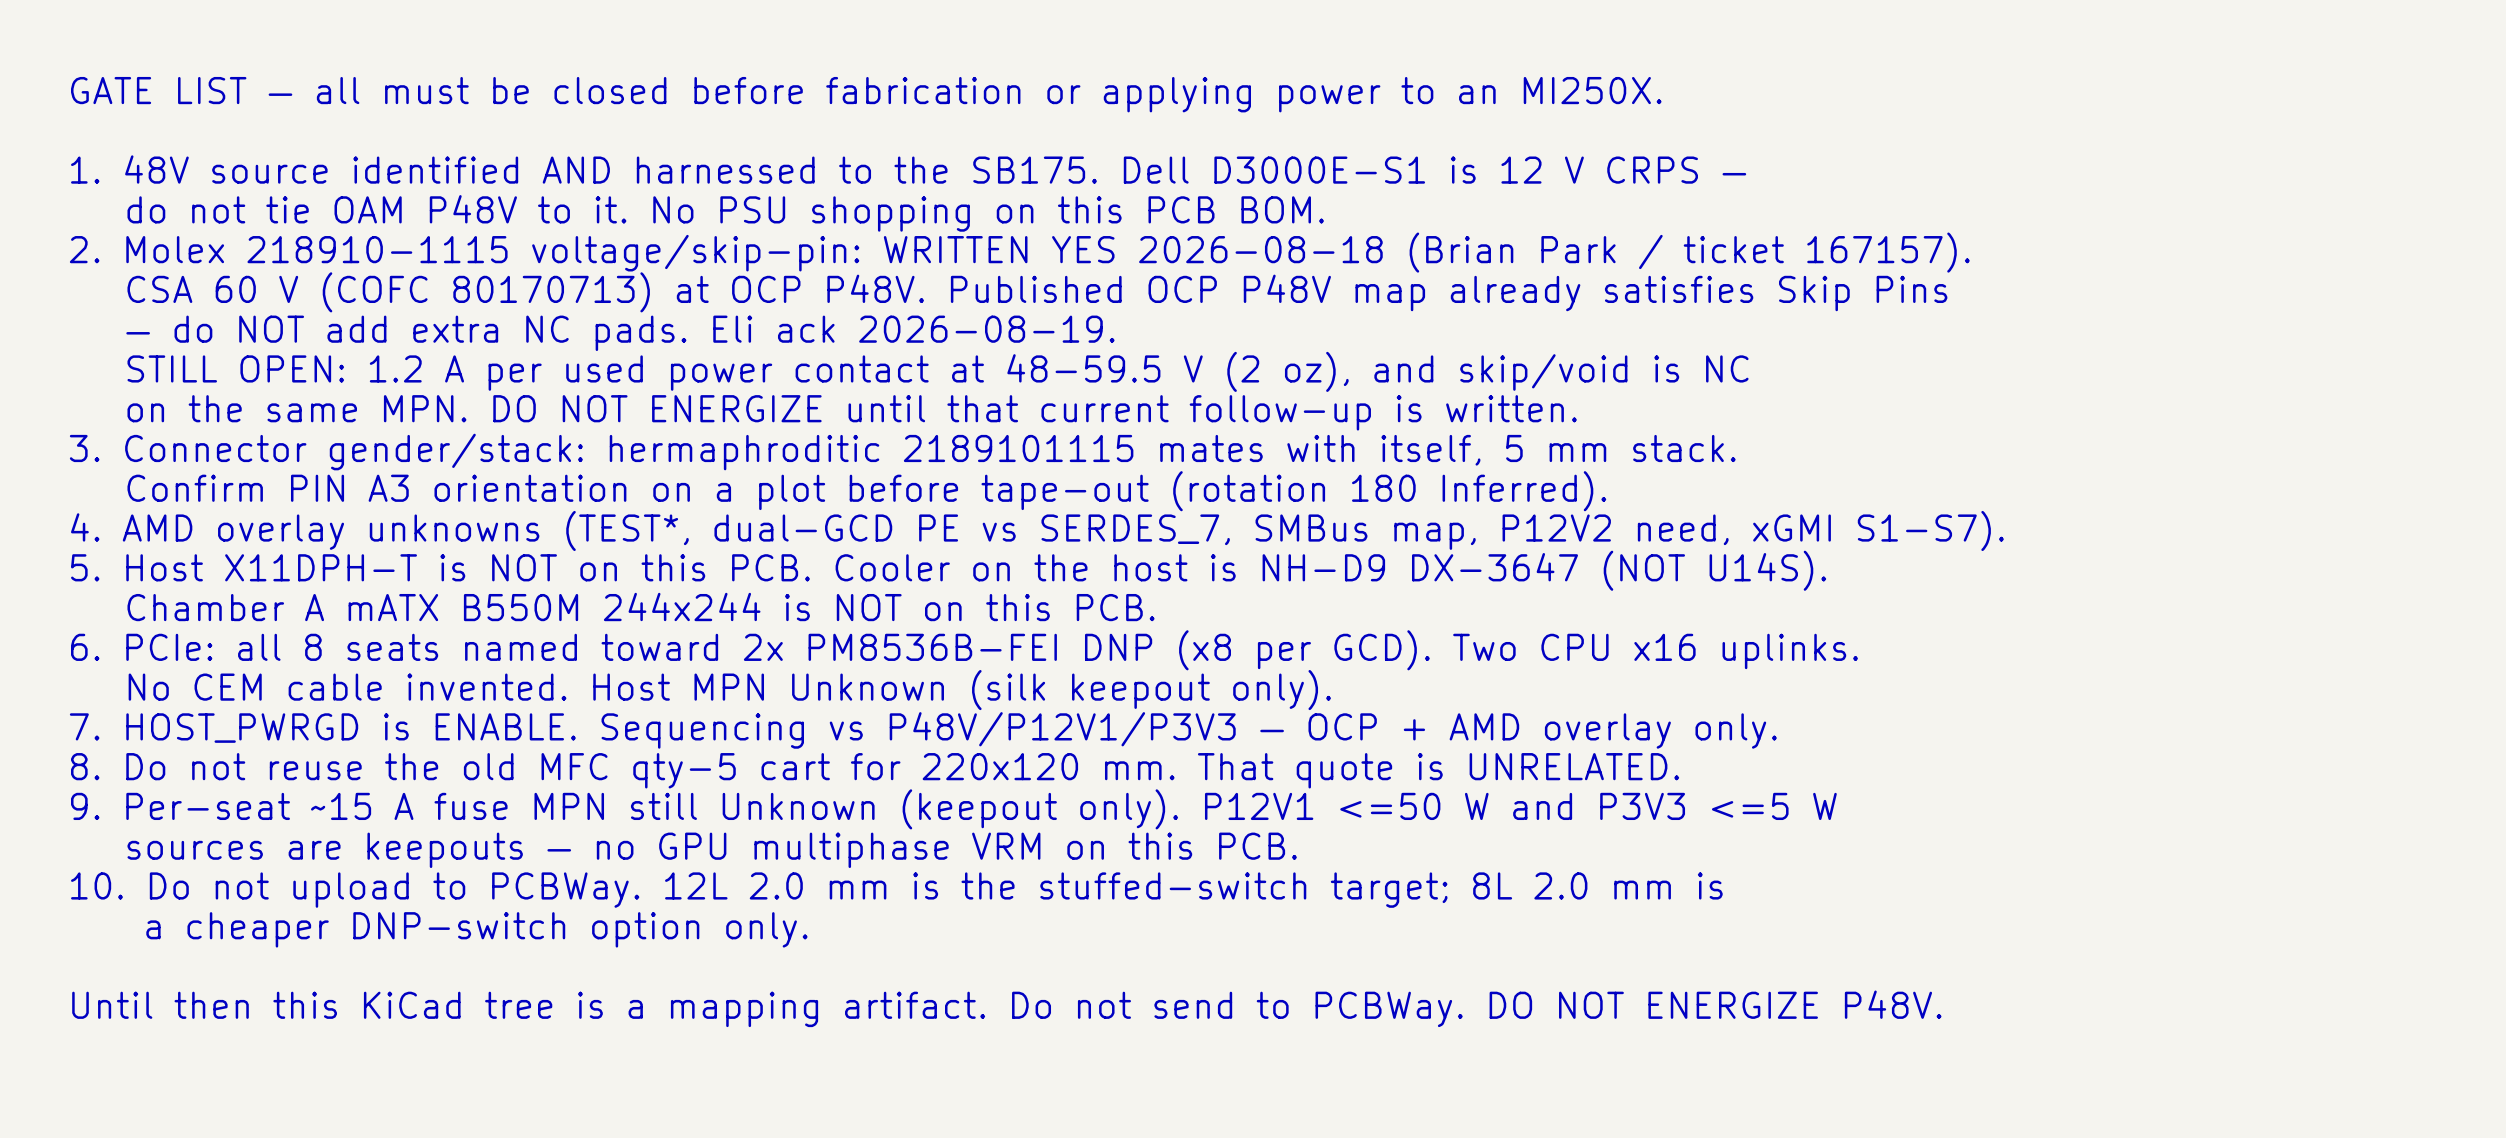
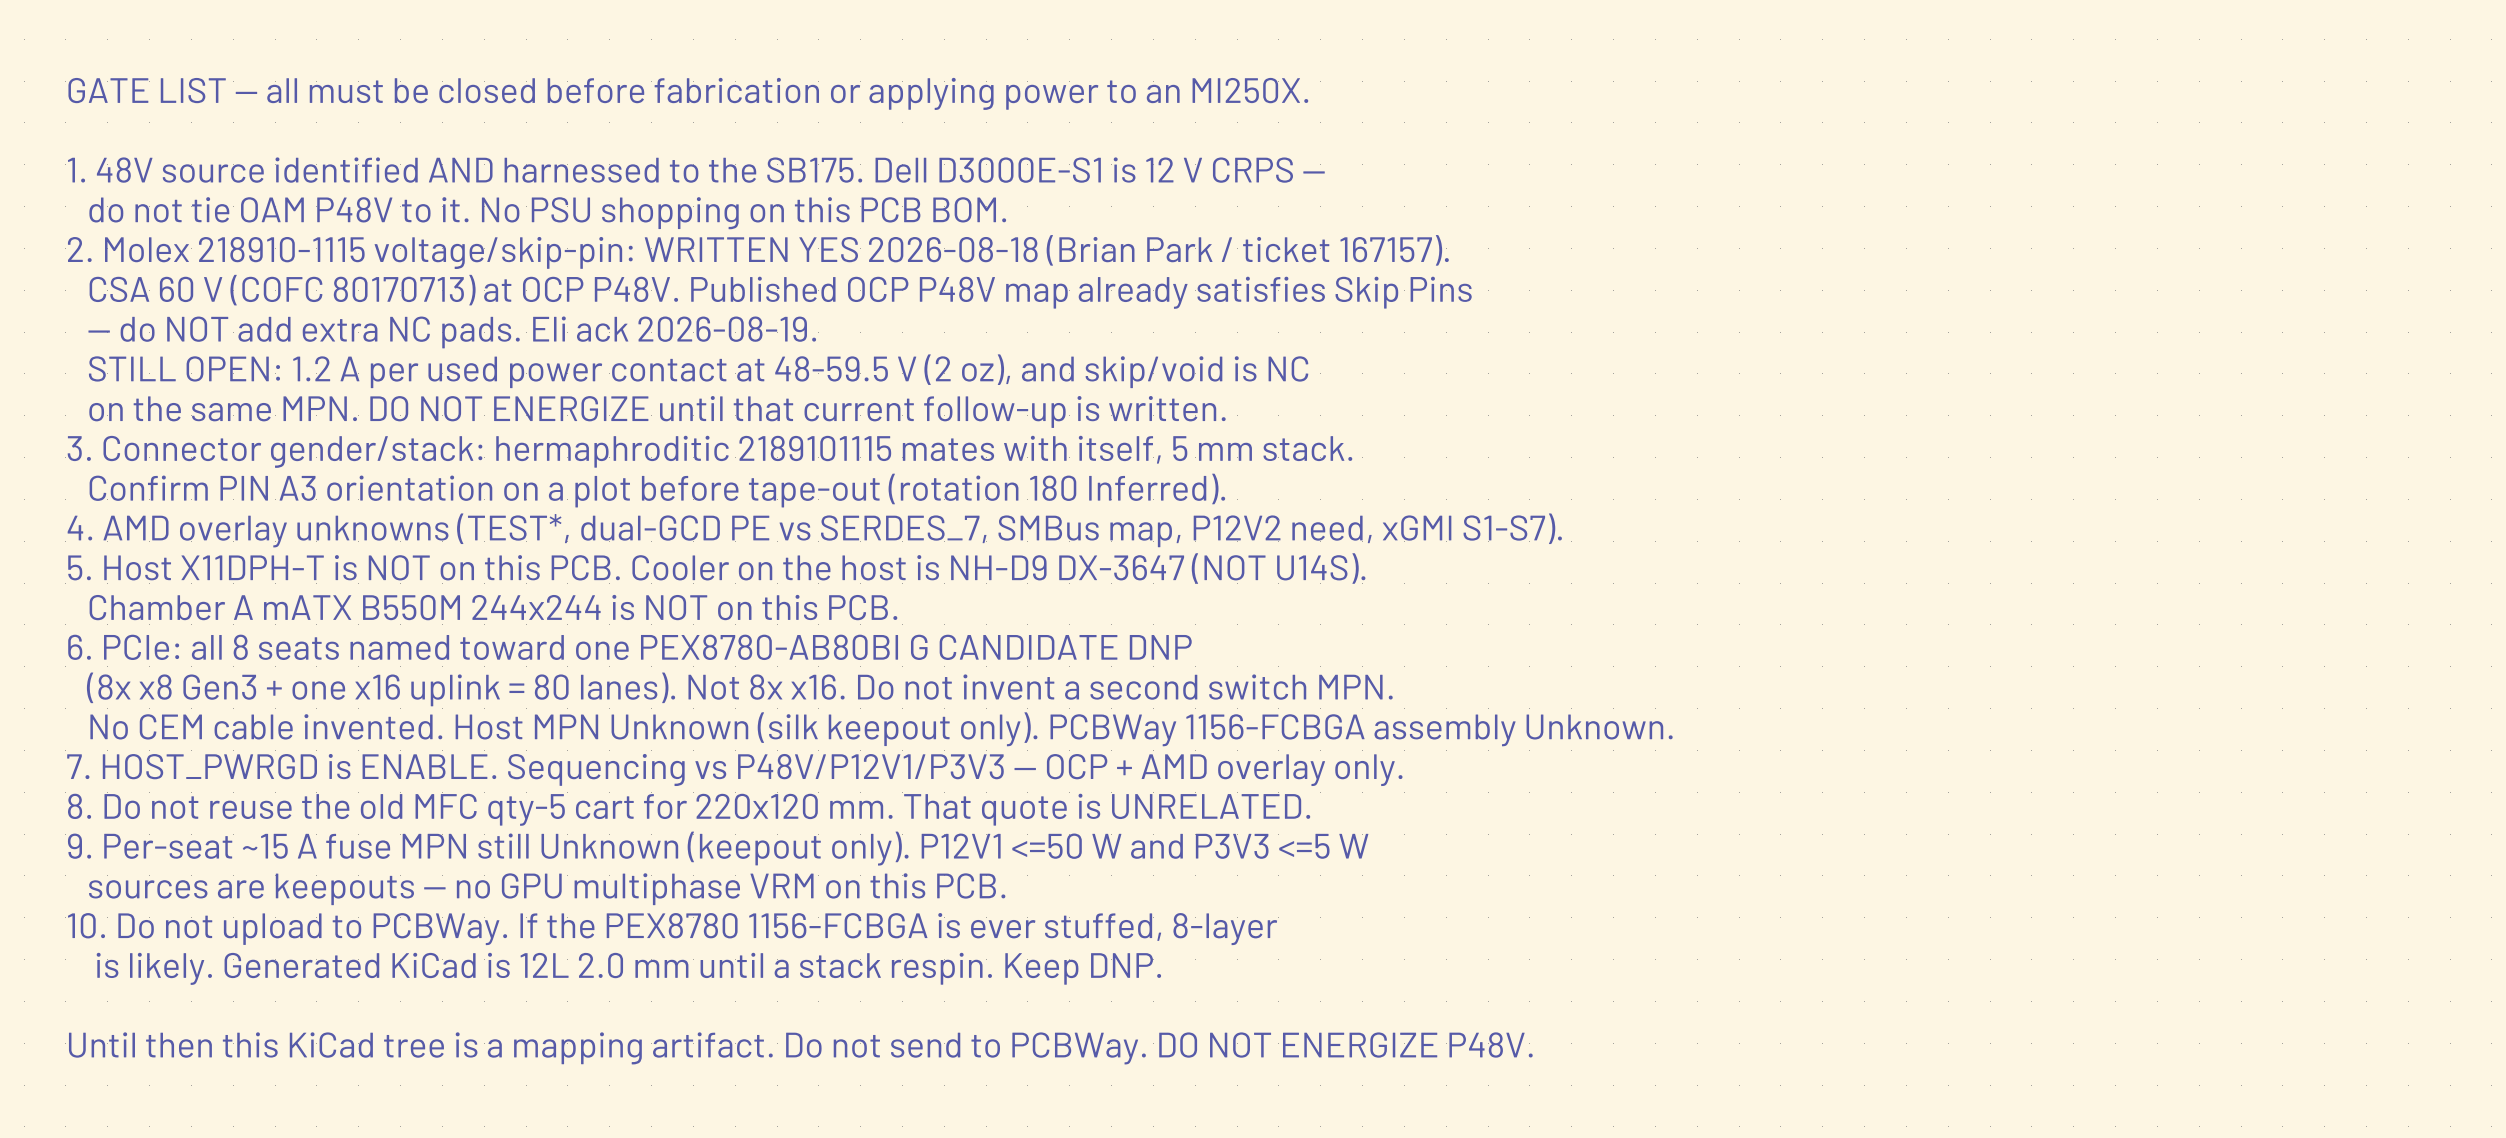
text: 6. PCIe: all 8 seats named toward 2x PM8536B-FEI DNP (x8 per GCD). Two CPU x16 uplinks. (964, 650) -> 6. PCIe: all 8 seats named toward one PEX8780-AB80BI G CANDIDATE DNP (629, 647)
text: No CEM cable invented. Host MPN Unknown (silk keepout only). (729, 690) -> (8x x8 Gen3 + one x16 uplink = 80 lanes). Not 8x x16. Do not invent a second switch MPN. (739, 689)
text: 7. HOST_PWRGD is ENABLE. Sequencing vs P48V/P12V1/P3V3 — OCP + AMD overlay only. (923, 730) -> No CEM cable invented. Host MPN Unknown (silk keepout only). PCBWay 1156-FCBGA assembly Unknown. (881, 729)
text: 8. Do not reuse the old MFC qty-5 cart for 220x120 mm. That quote is UNRELATED. (875, 770) -> 7. HOST_PWRGD is ENABLE. Sequencing vs P48V/P12V1/P3V3 — OCP + AMD overlay only. (734, 770)
text: 9. Per-seat ~15 A fuse MPN still Unknown (keepout only). P12V1 <=50 W and P3V3 <=5 W (953, 809) -> 8. Do not reuse the old MFC qty-5 cart for 220x120 mm. That quote is UNRELATED. (689, 809)
text: sources are keepouts — no GPU multiphase VRM on this PCB. (712, 850) -> 9. Per-seat ~15 A fuse MPN still Unknown (keepout only). P12V1 <=50 W and P3V3 <=5 W (718, 848)
text: 10. Do not upload to PCBWay. 12L 2.0 mm is the stuffed-switch target; 8L 2.0 mm is (896, 890) -> sources are keepouts — no GPU multiphase VRM on this PCB. (547, 889)
text: a cheaper DNP-switch option only. (476, 929) -> 10. Do not upload to PCBWay. If the PEX8780 1156-FCBGA is ever stuffed, 8-layer (672, 929)
text: none -> is likely. Generated KiCad is 12L 2.0 mm until a stack respin. Keep DNP. (628, 968)
text position: Until then this KiCad tree is a mapping artifact. Do not send to PCBWay. DO NOT ENERGIZE P48V. (1006, 1008) -> Until then this KiCad tree is a mapping artifact. Do not send to PCBWay. DO NOT ENERGIZE P48V. (800, 1048)

